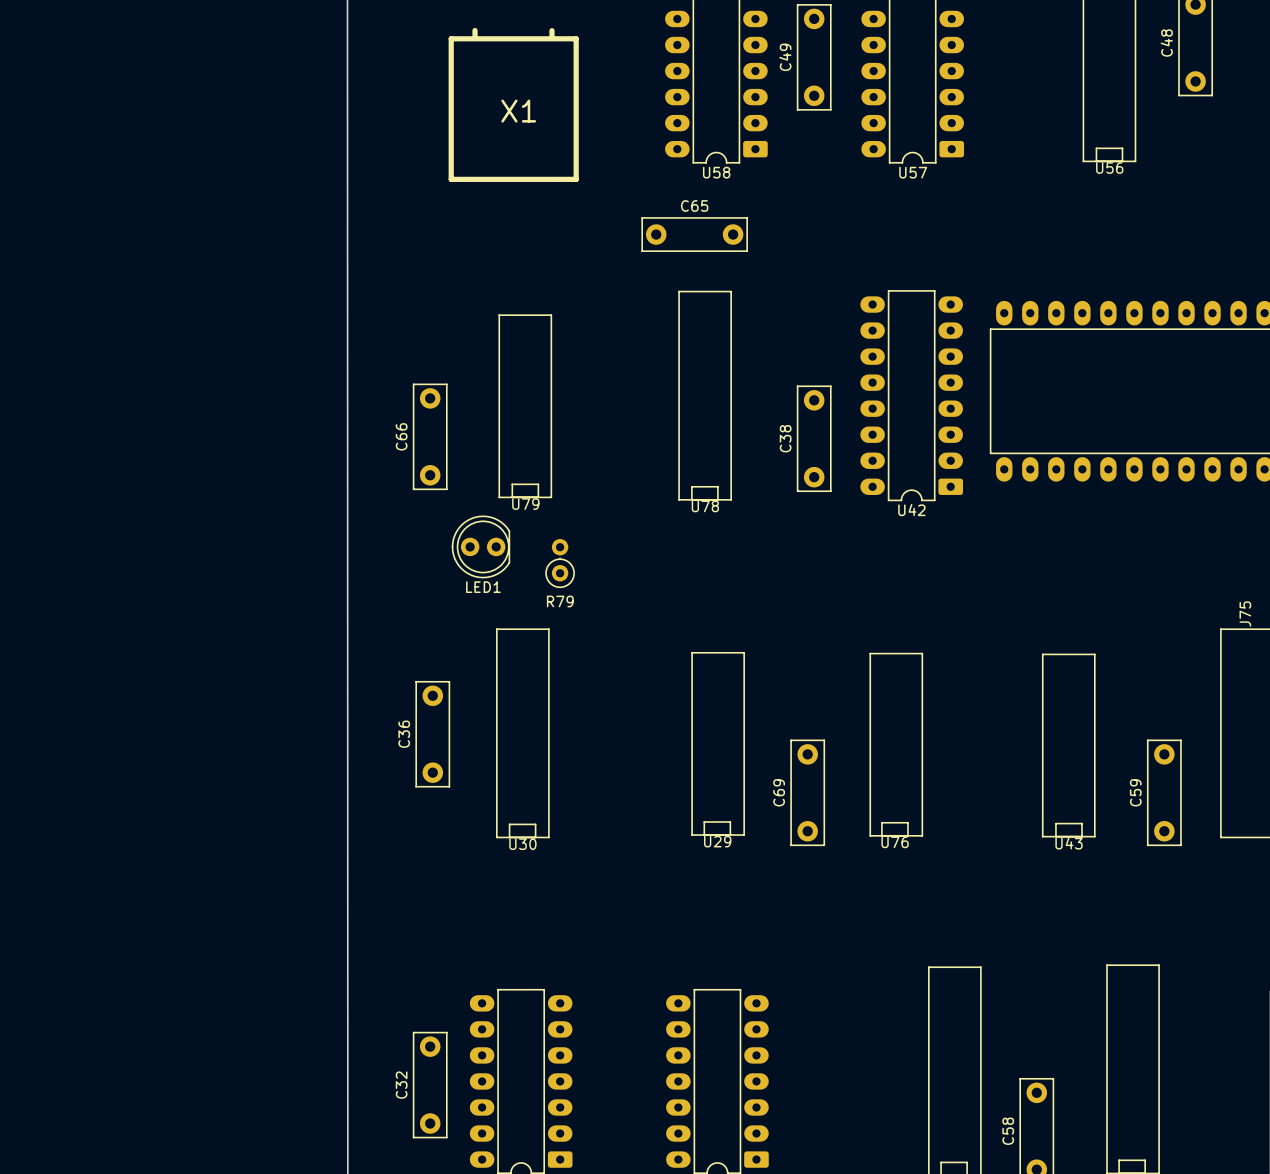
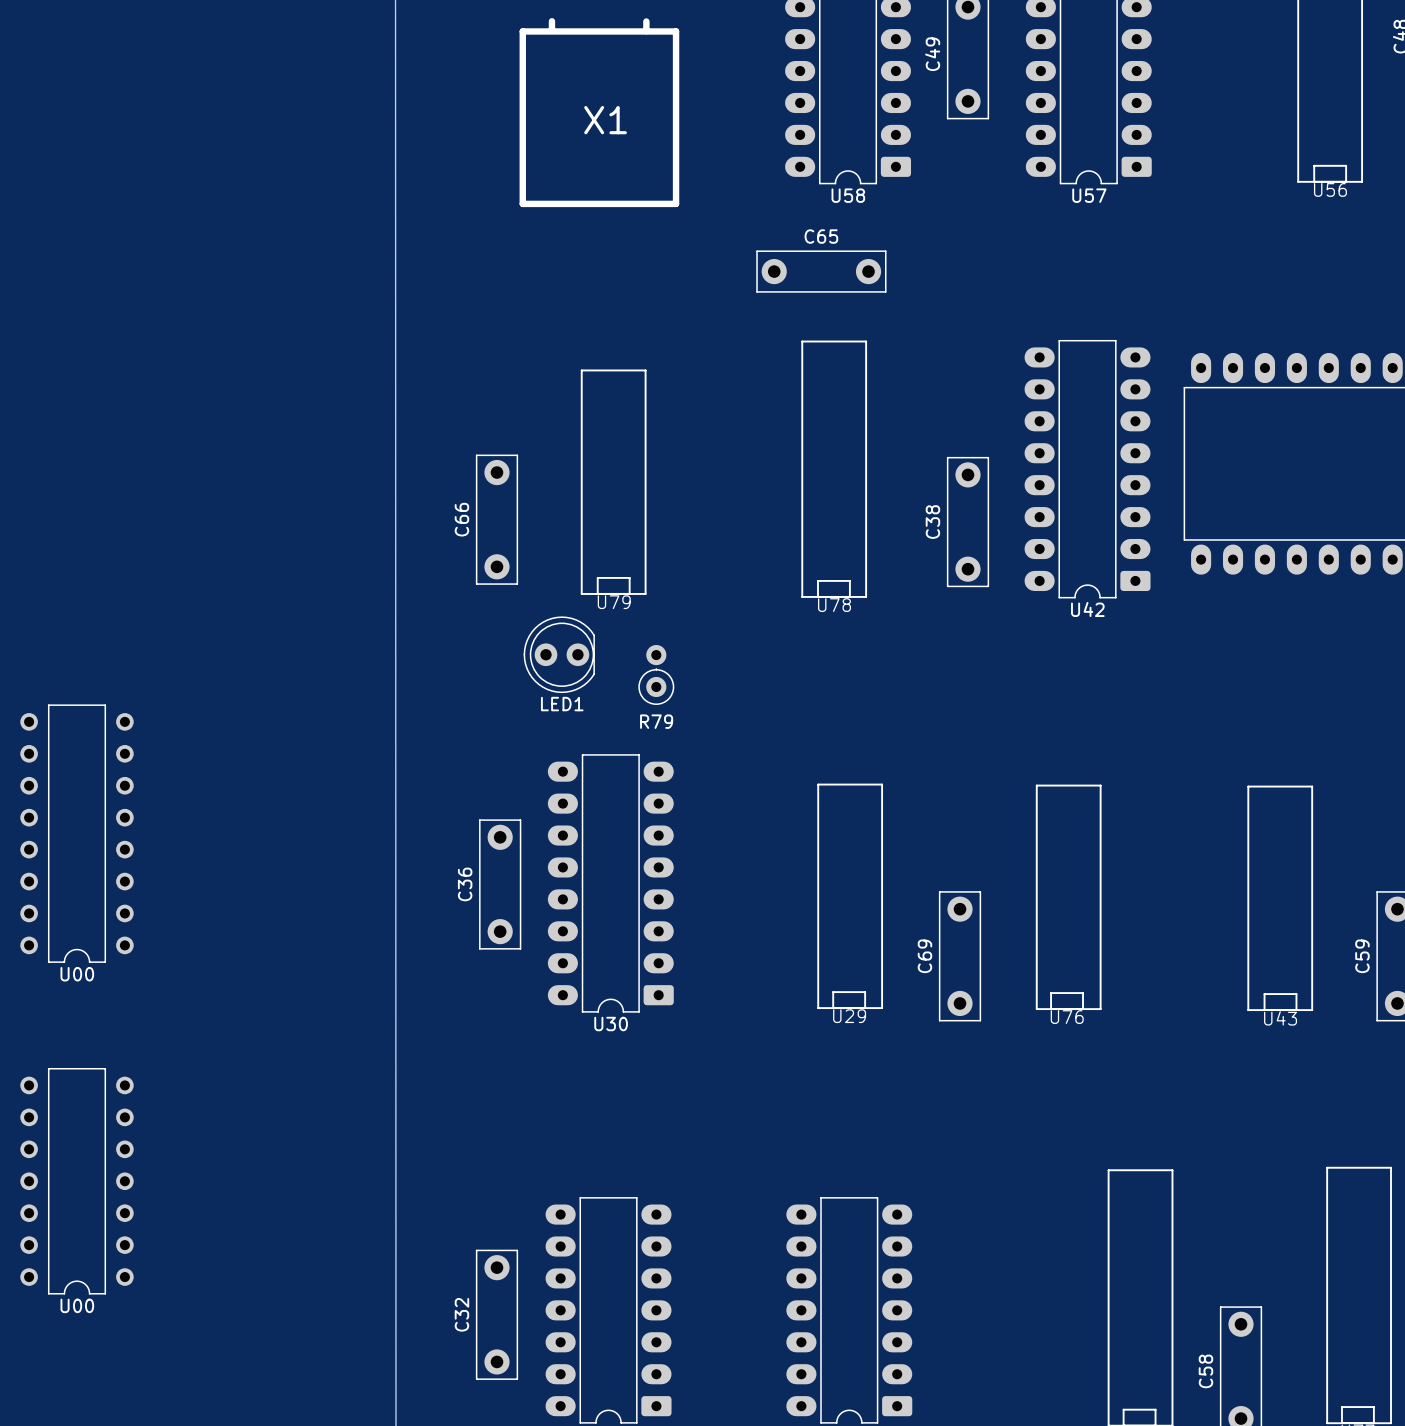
line: (496, 629) (496, 837) (548, 837) (548, 629) (496, 629) -> none
U00: none -> (77, 833)
U30: none -> (610, 883)
line: (509, 837) (509, 824) (535, 824) (535, 837) -> none
text: U30 (522, 844) -> none
U00: none -> (77, 1181)

